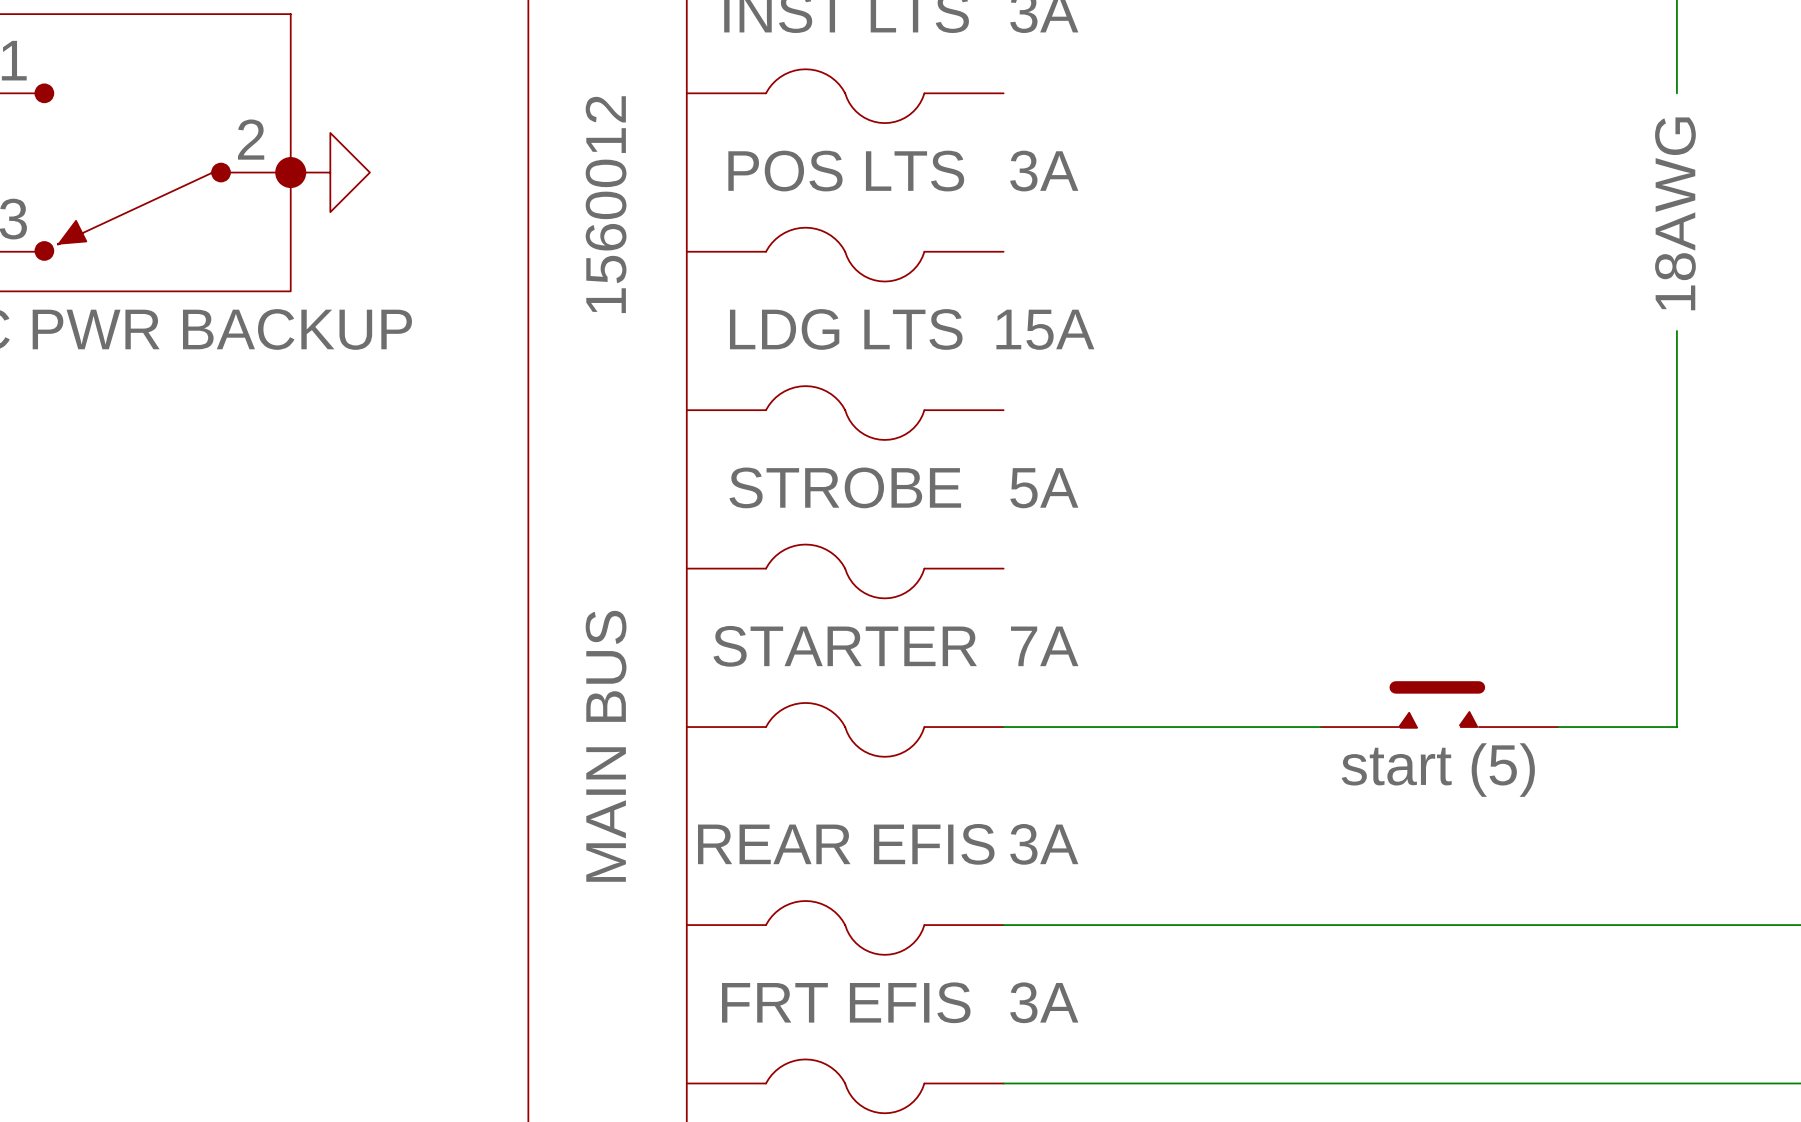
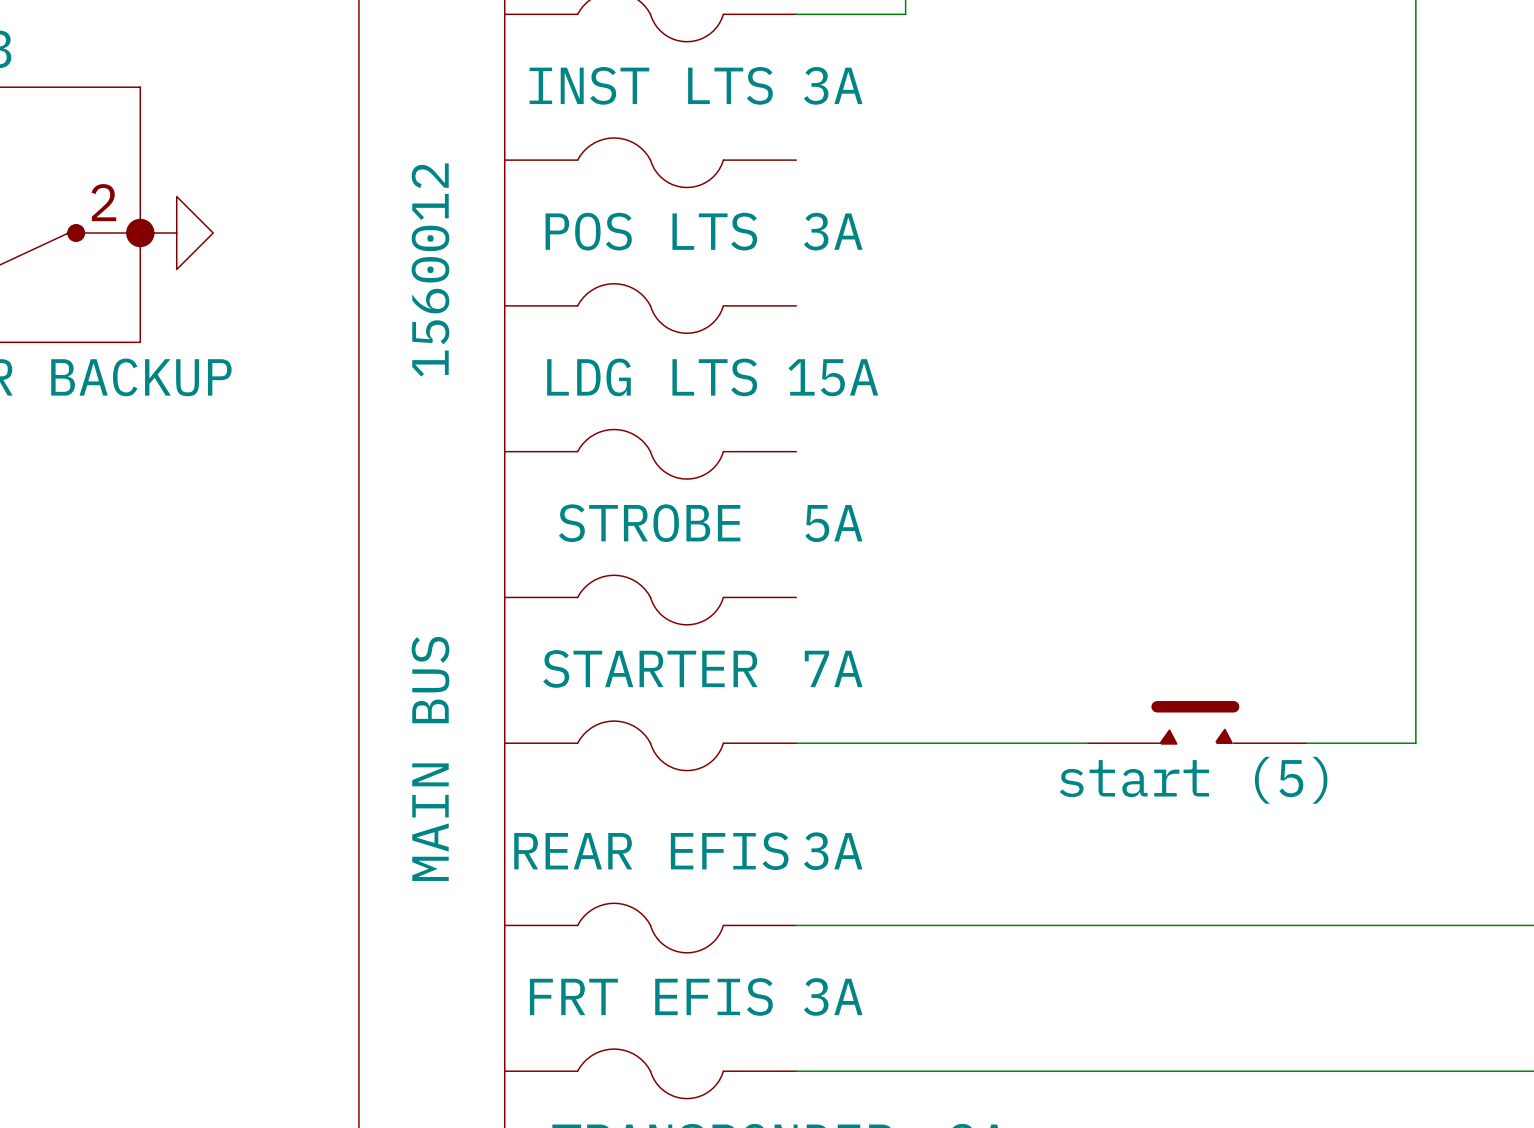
wire: none -> (1415, 160) (1415, 378)
part: 18AWG (1675, 213) -> none

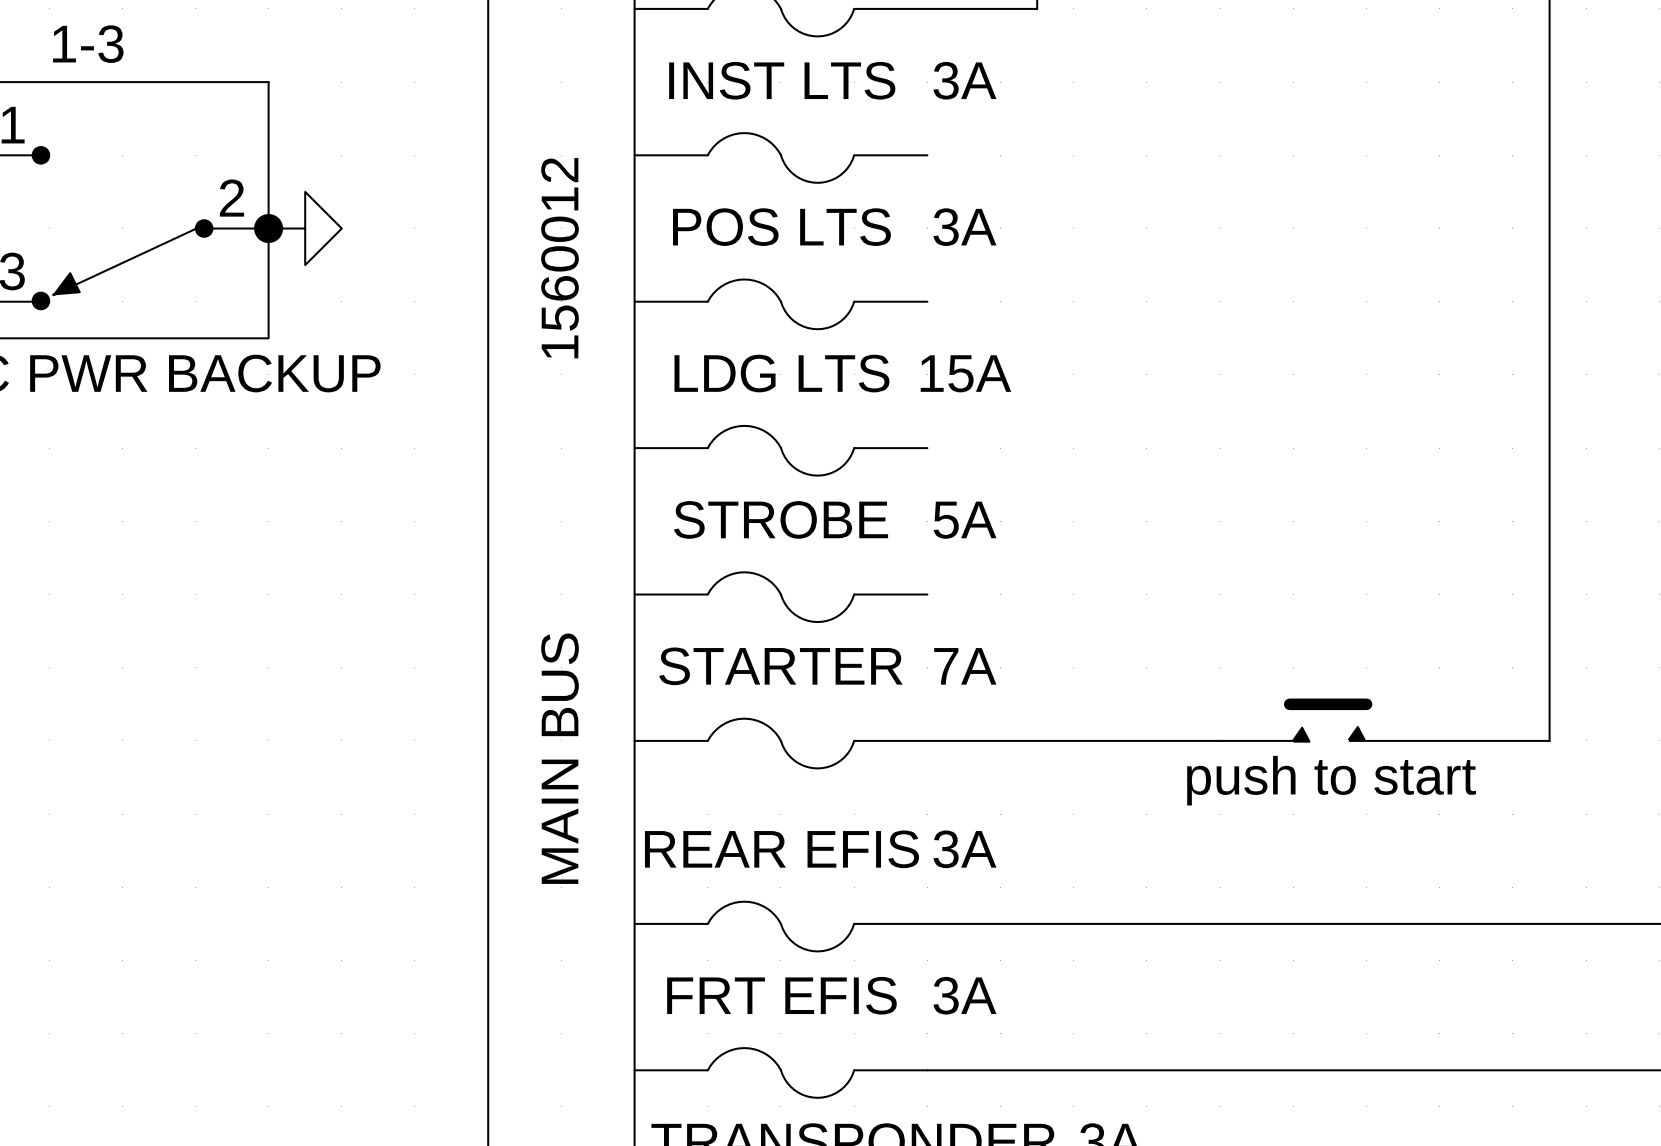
part text: start (5) (1193, 780) -> push to start (1331, 780)

